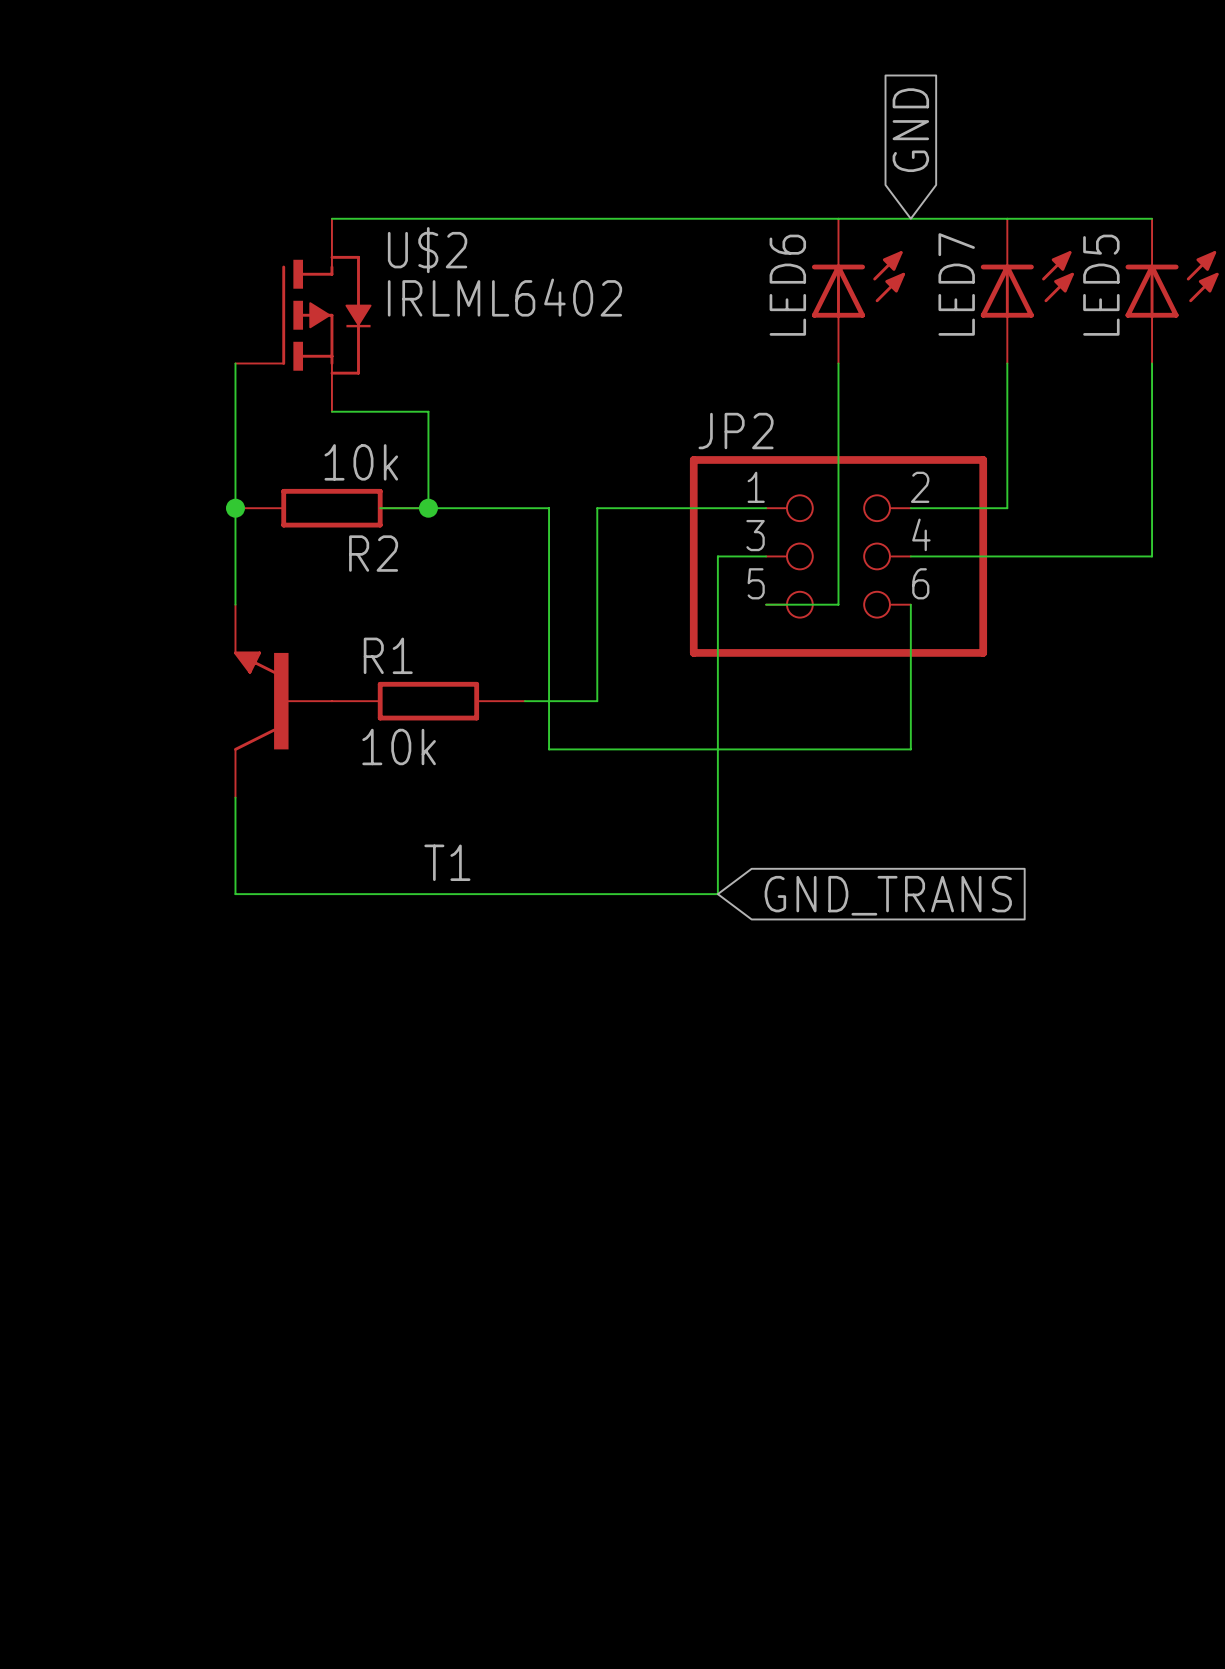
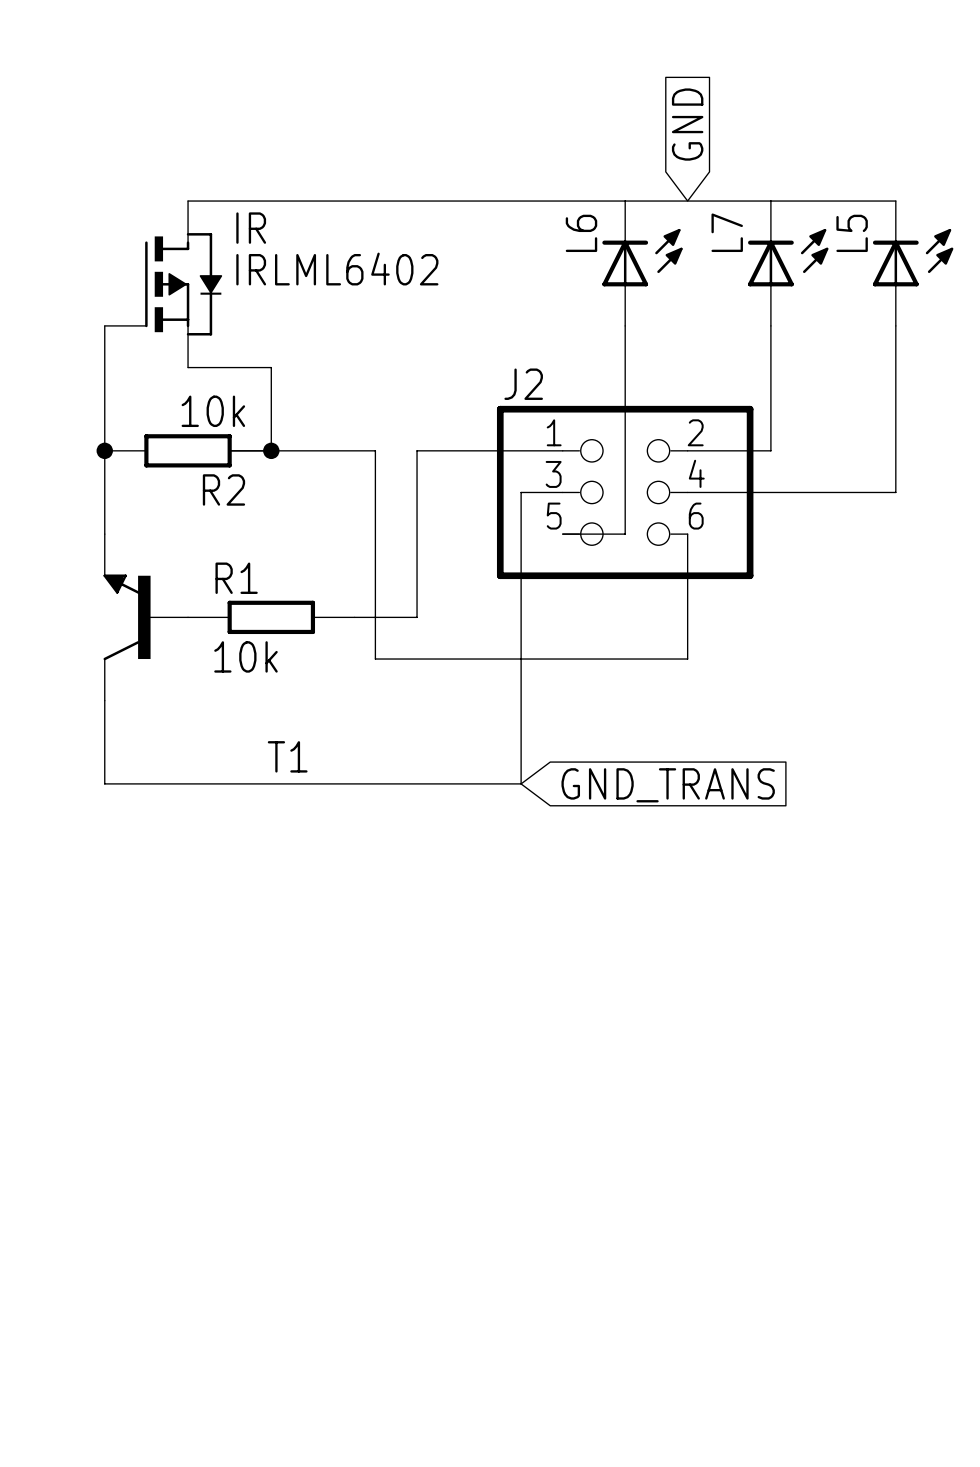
U$2 name: U$2 (427, 250) -> IR (251, 228)
LED7 name: LED7 (956, 284) -> L7 (727, 232)
LED6 name: LED6 (787, 285) -> L6 (581, 233)
LED5 name: LED5 (1101, 285) -> L5 (852, 233)
JP2 name: JP2 (736, 431) -> J2 (523, 384)

